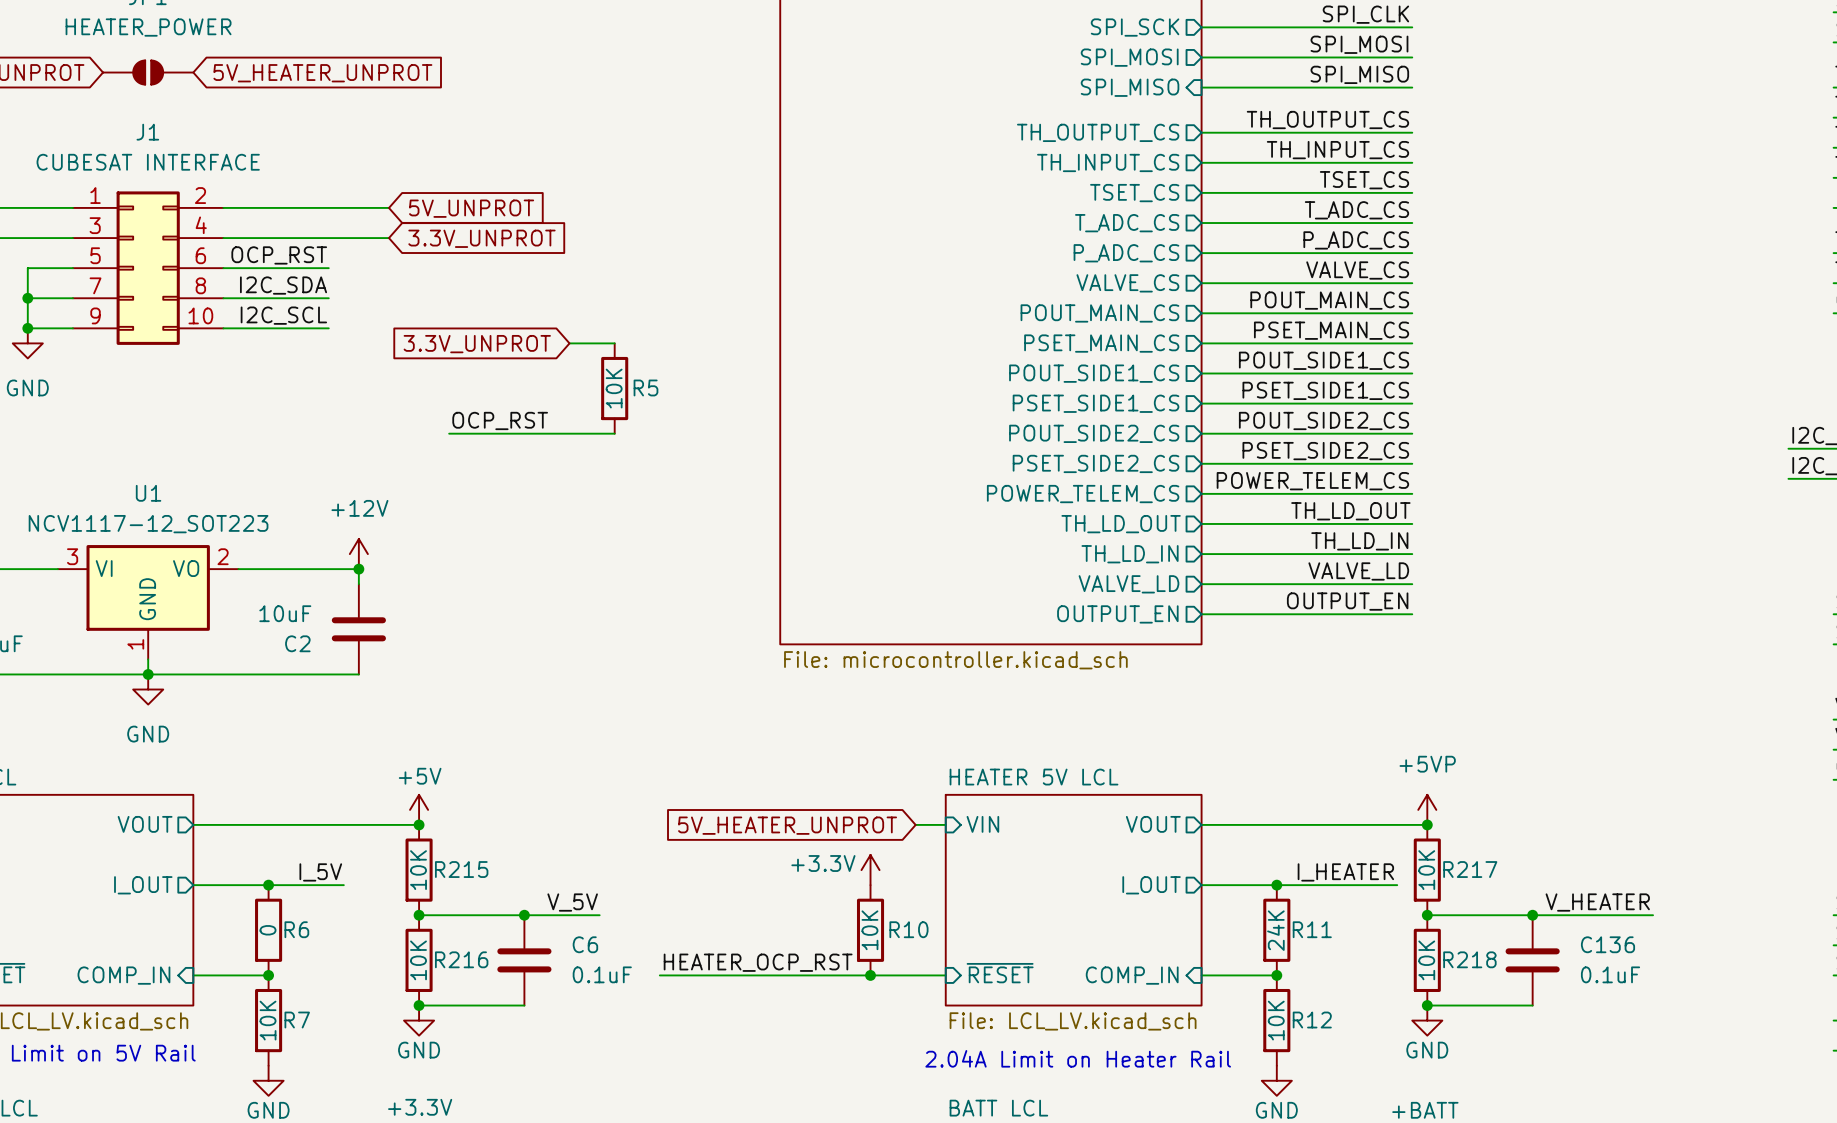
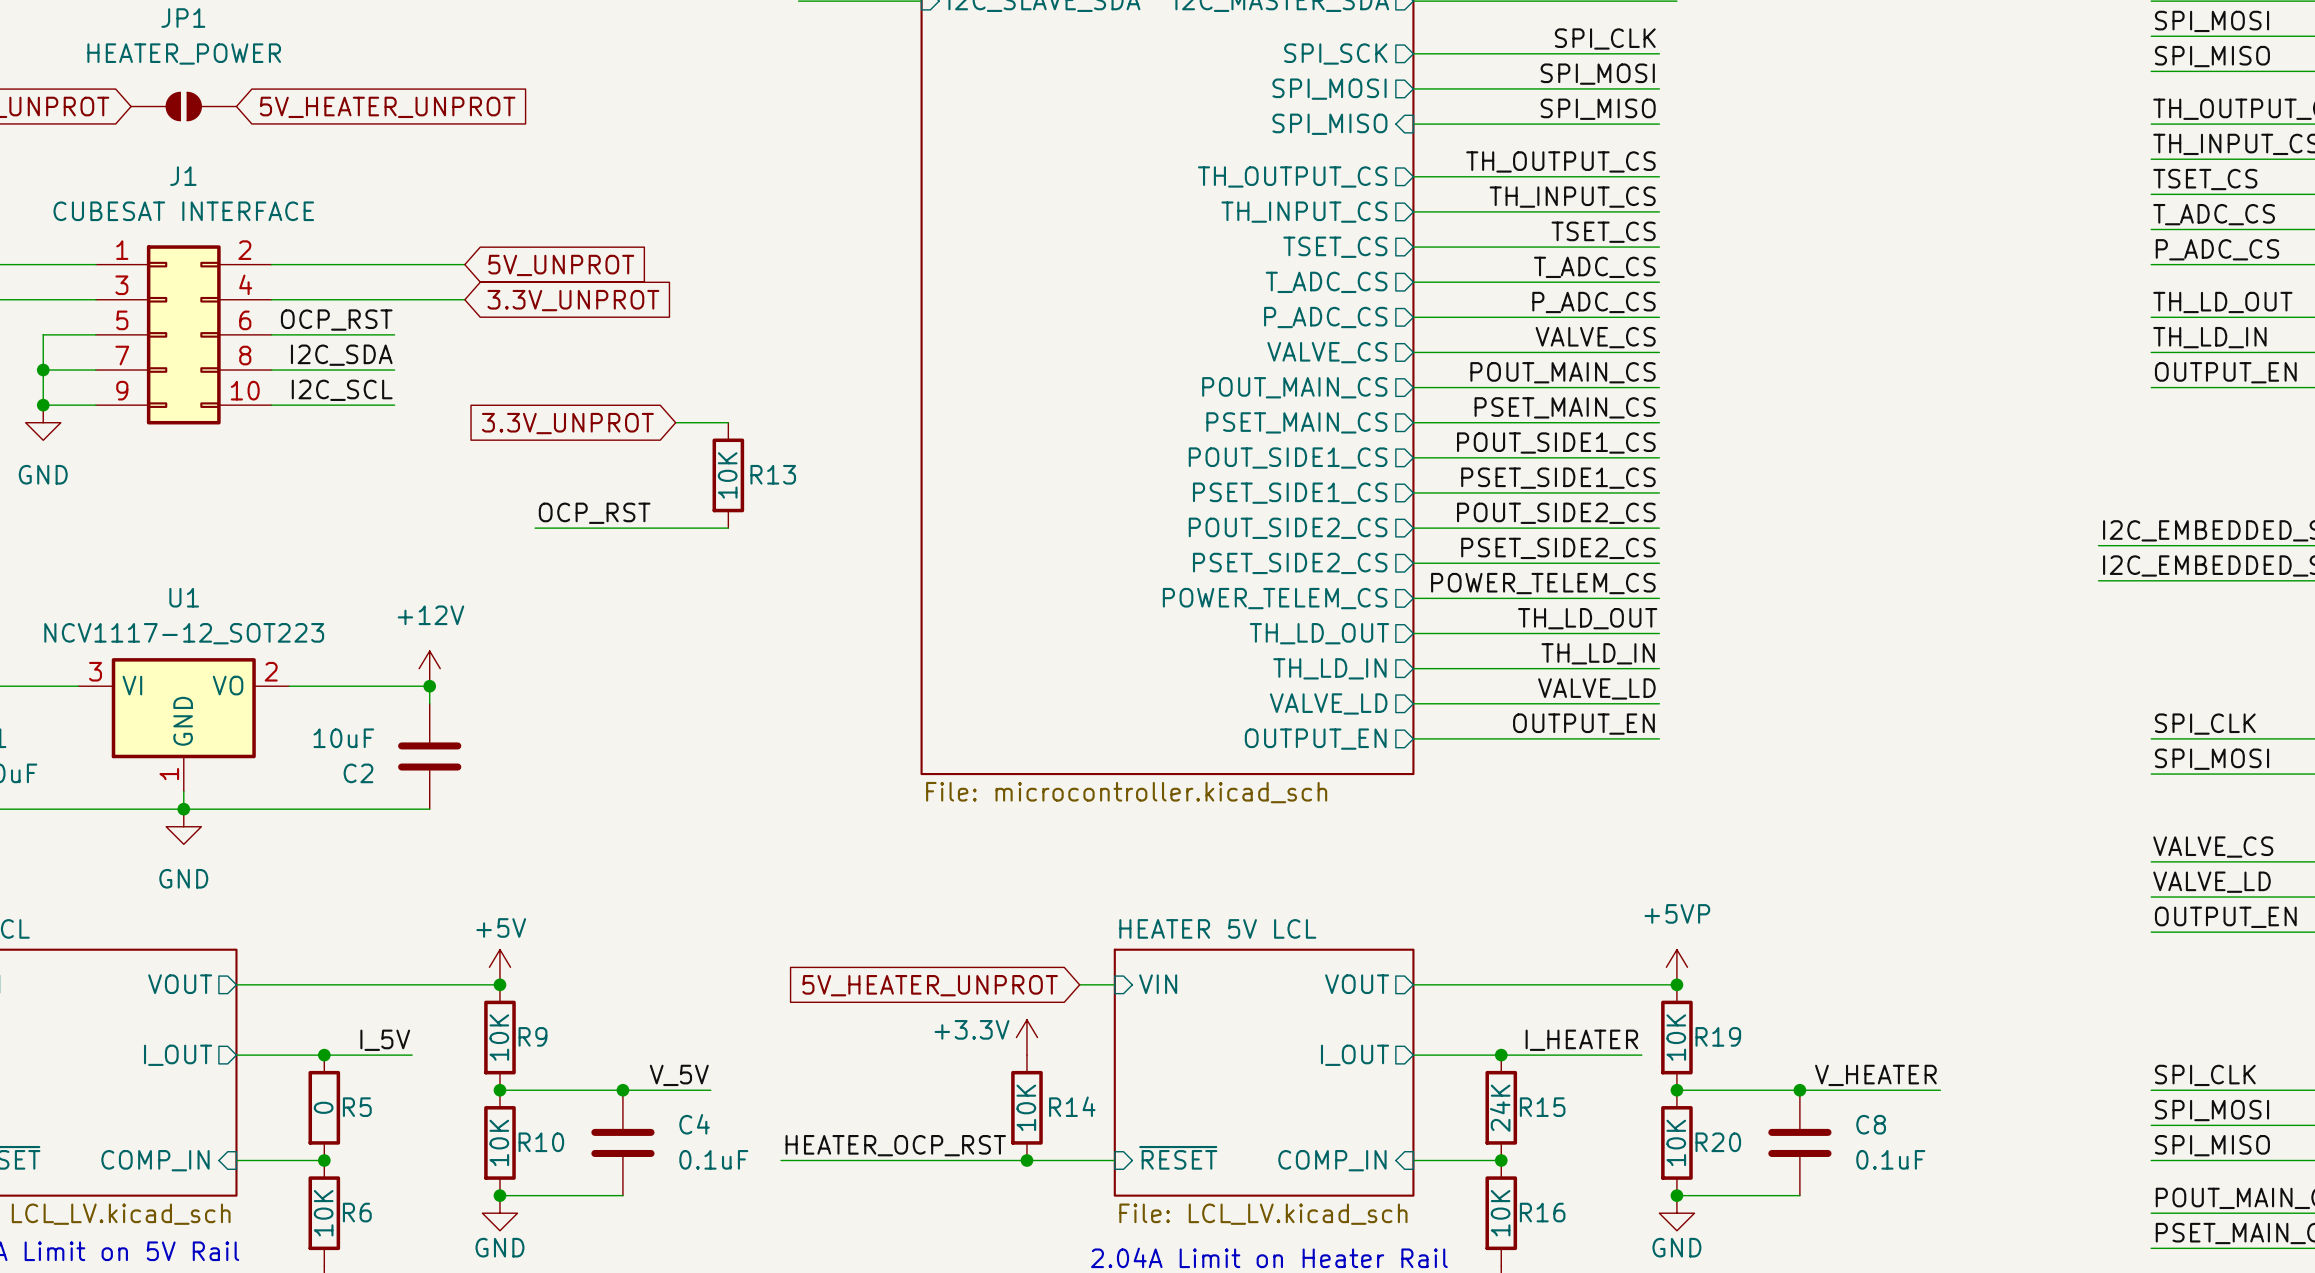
R5 name: R5 (645, 387) -> R13 (773, 474)
R215 name: R215 (461, 869) -> R9 (532, 1036)
R217 name: R217 (1470, 869) -> R19 (1718, 1036)
R6 name: R6 (296, 929) -> R5 (357, 1107)
R10 name: R10 (908, 929) -> R14 (1072, 1106)
R11 name: R11 (1312, 929) -> R15 (1542, 1107)
C6 name: C6 (585, 944) -> C4 (694, 1124)
C136 name: C136 (1608, 944) -> C8 (1871, 1124)
R216 name: R216 (461, 959) -> R10 (541, 1142)
R218 name: R218 (1469, 959) -> R20 (1718, 1142)
R7 name: R7 (297, 1020) -> R6 (357, 1212)
R12 name: R12 (1312, 1020) -> R16 (1542, 1212)

